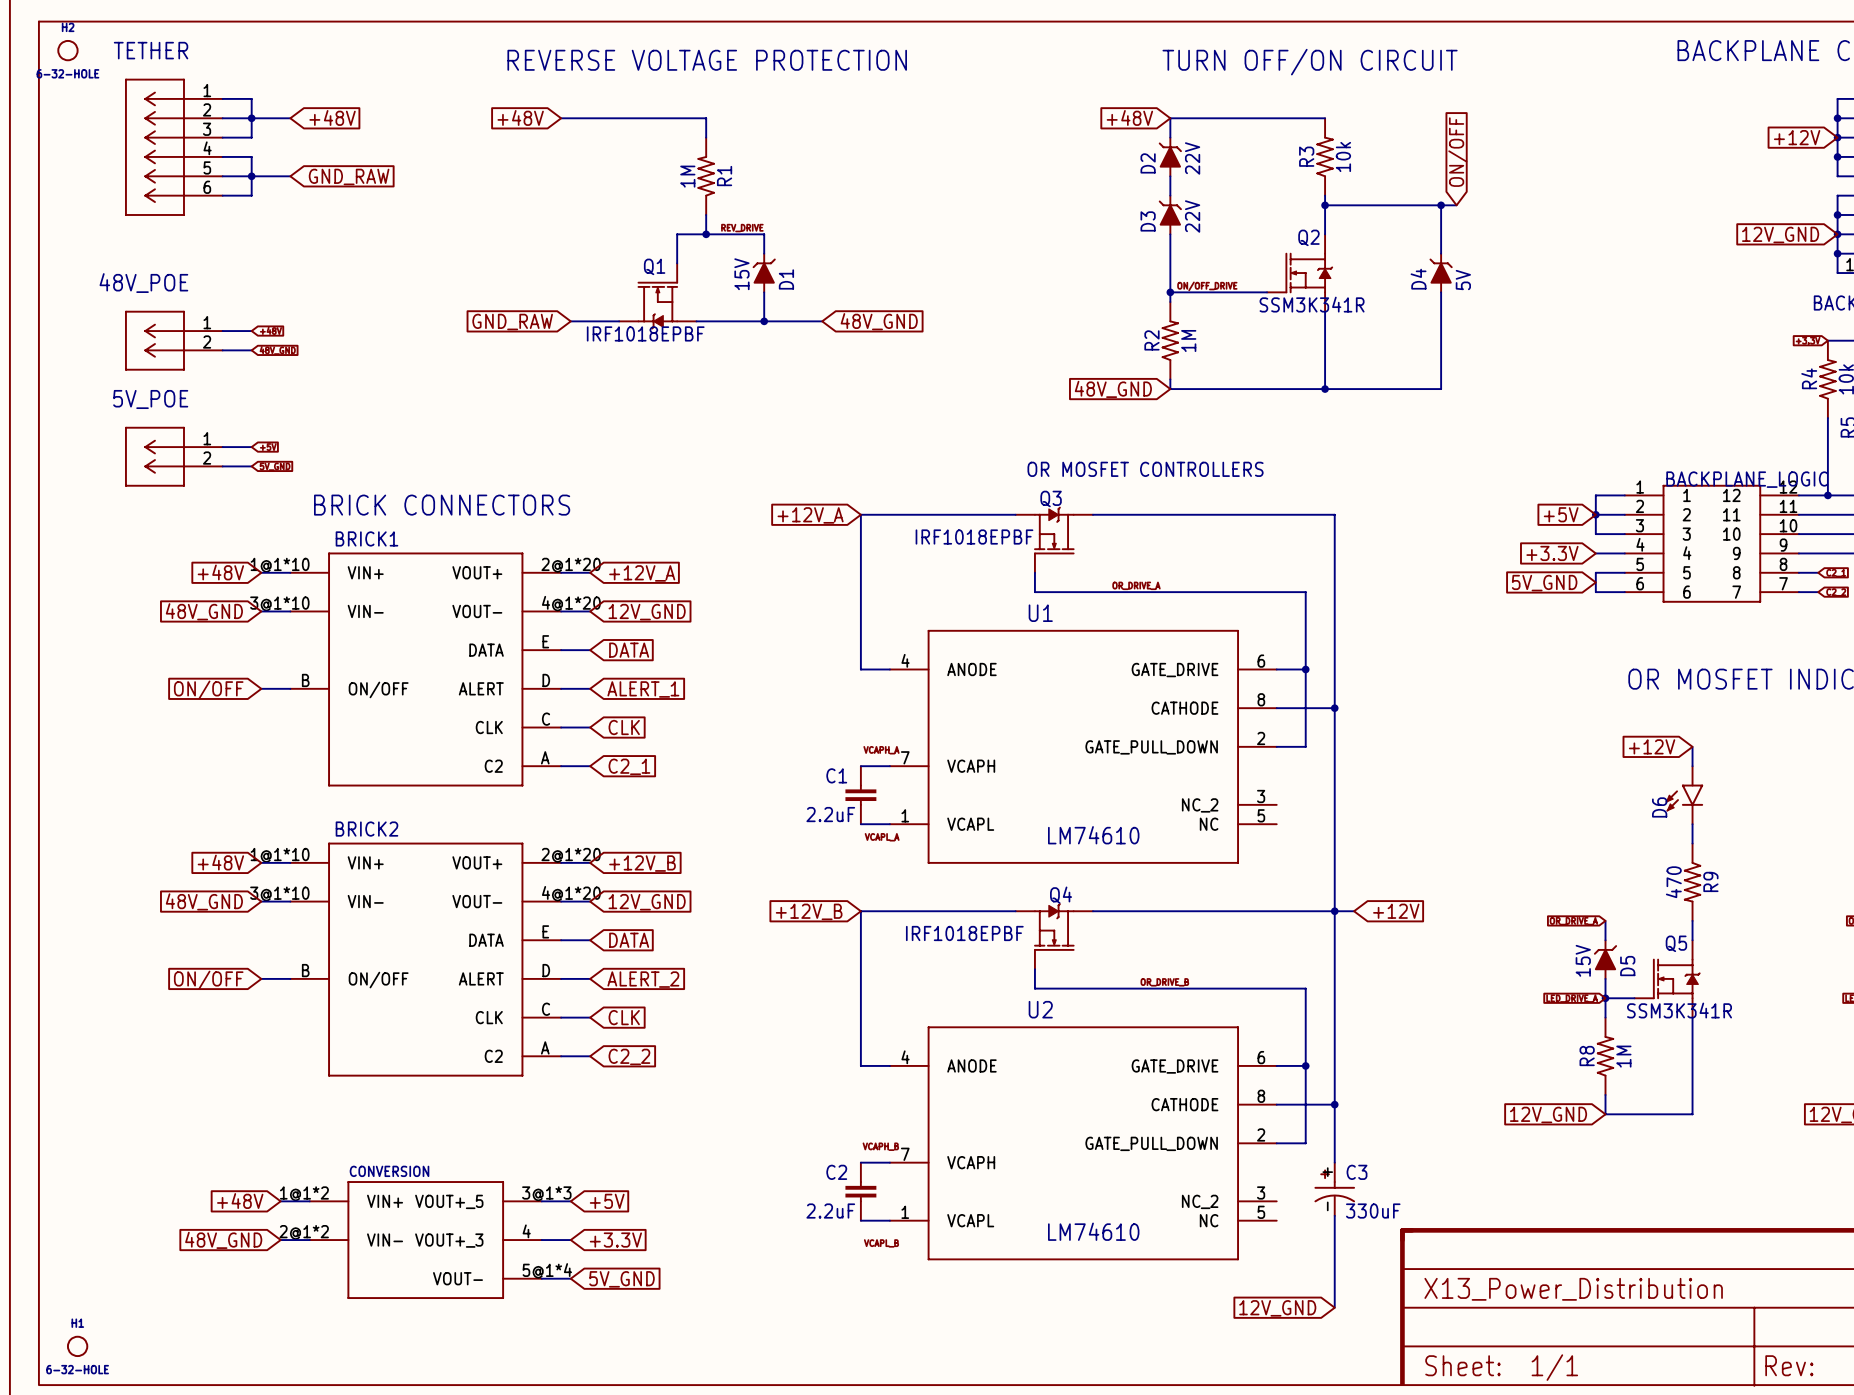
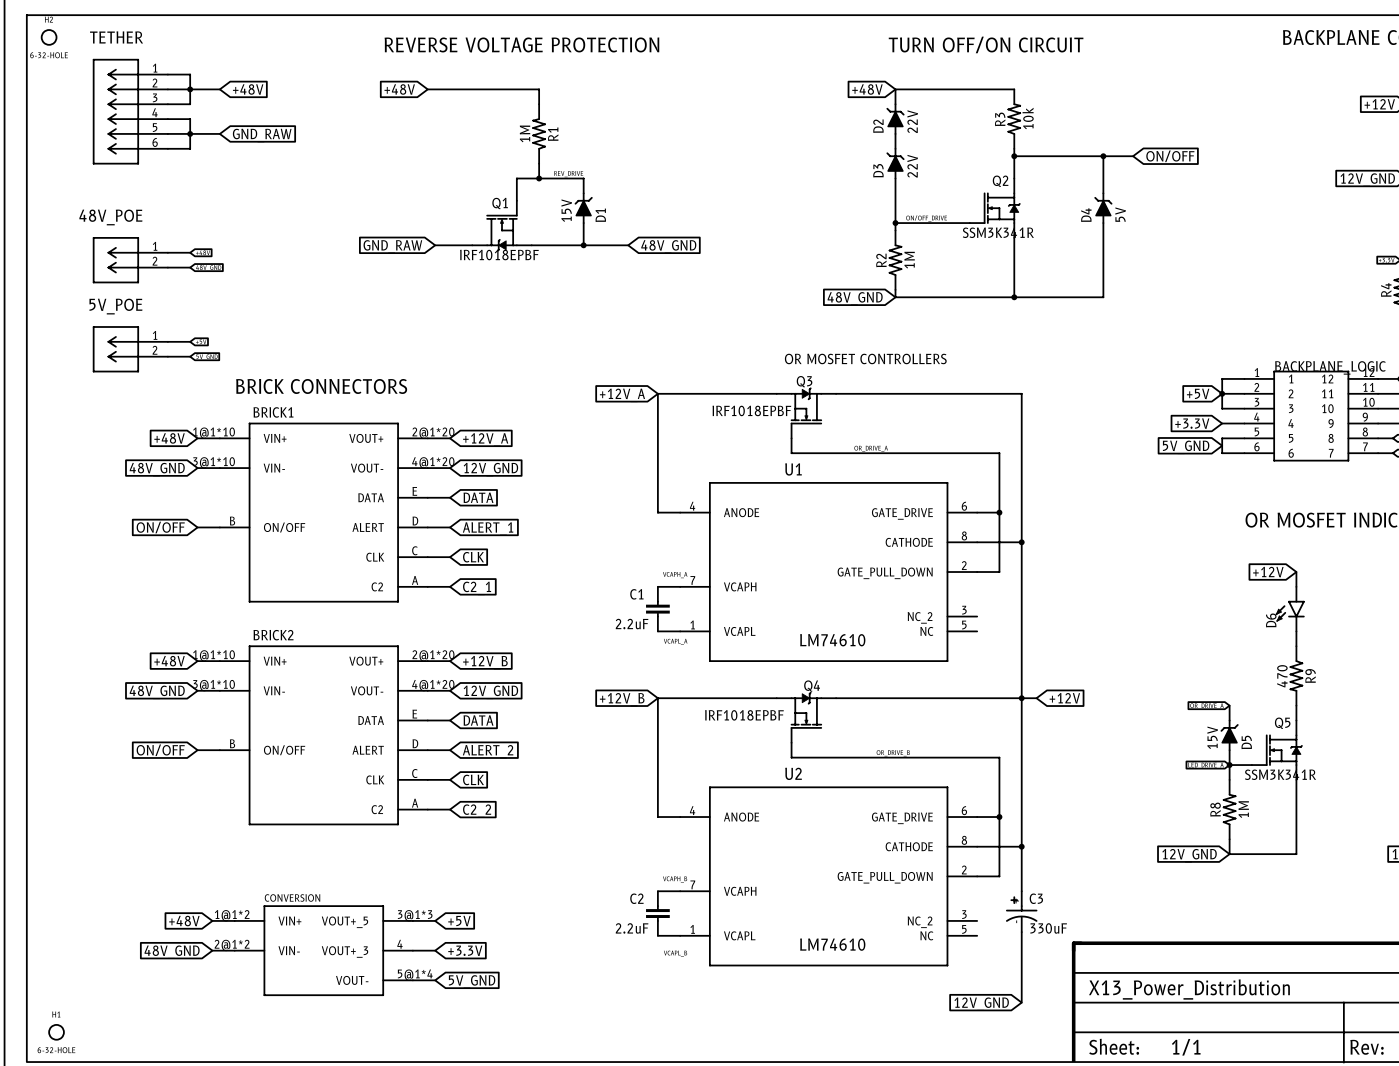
global label rotation: 0° (1457, 152) -> 90° clockwise (1170, 156)
wire: none -> (1115, 156) (1133, 156)

